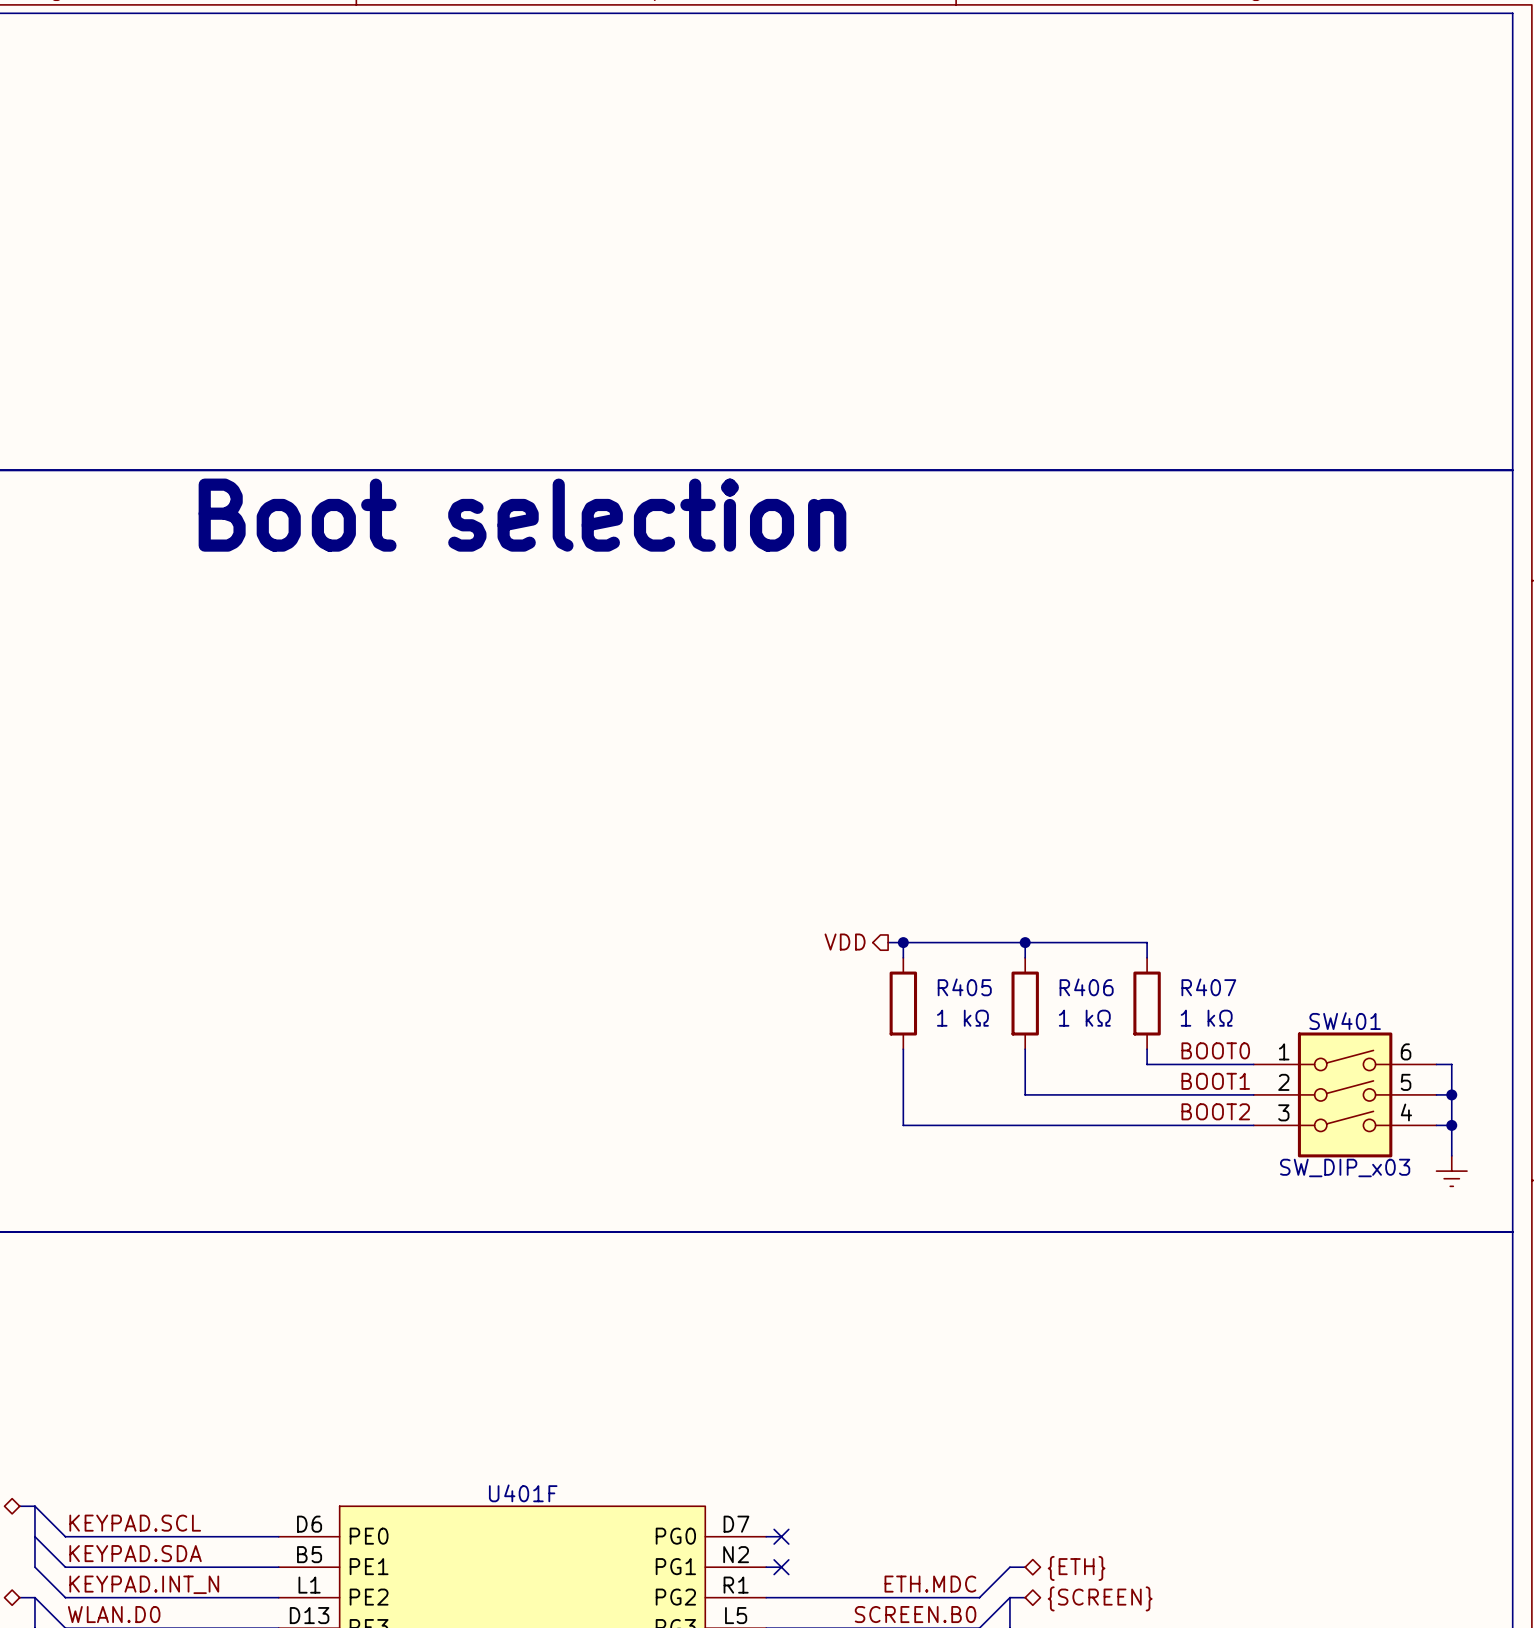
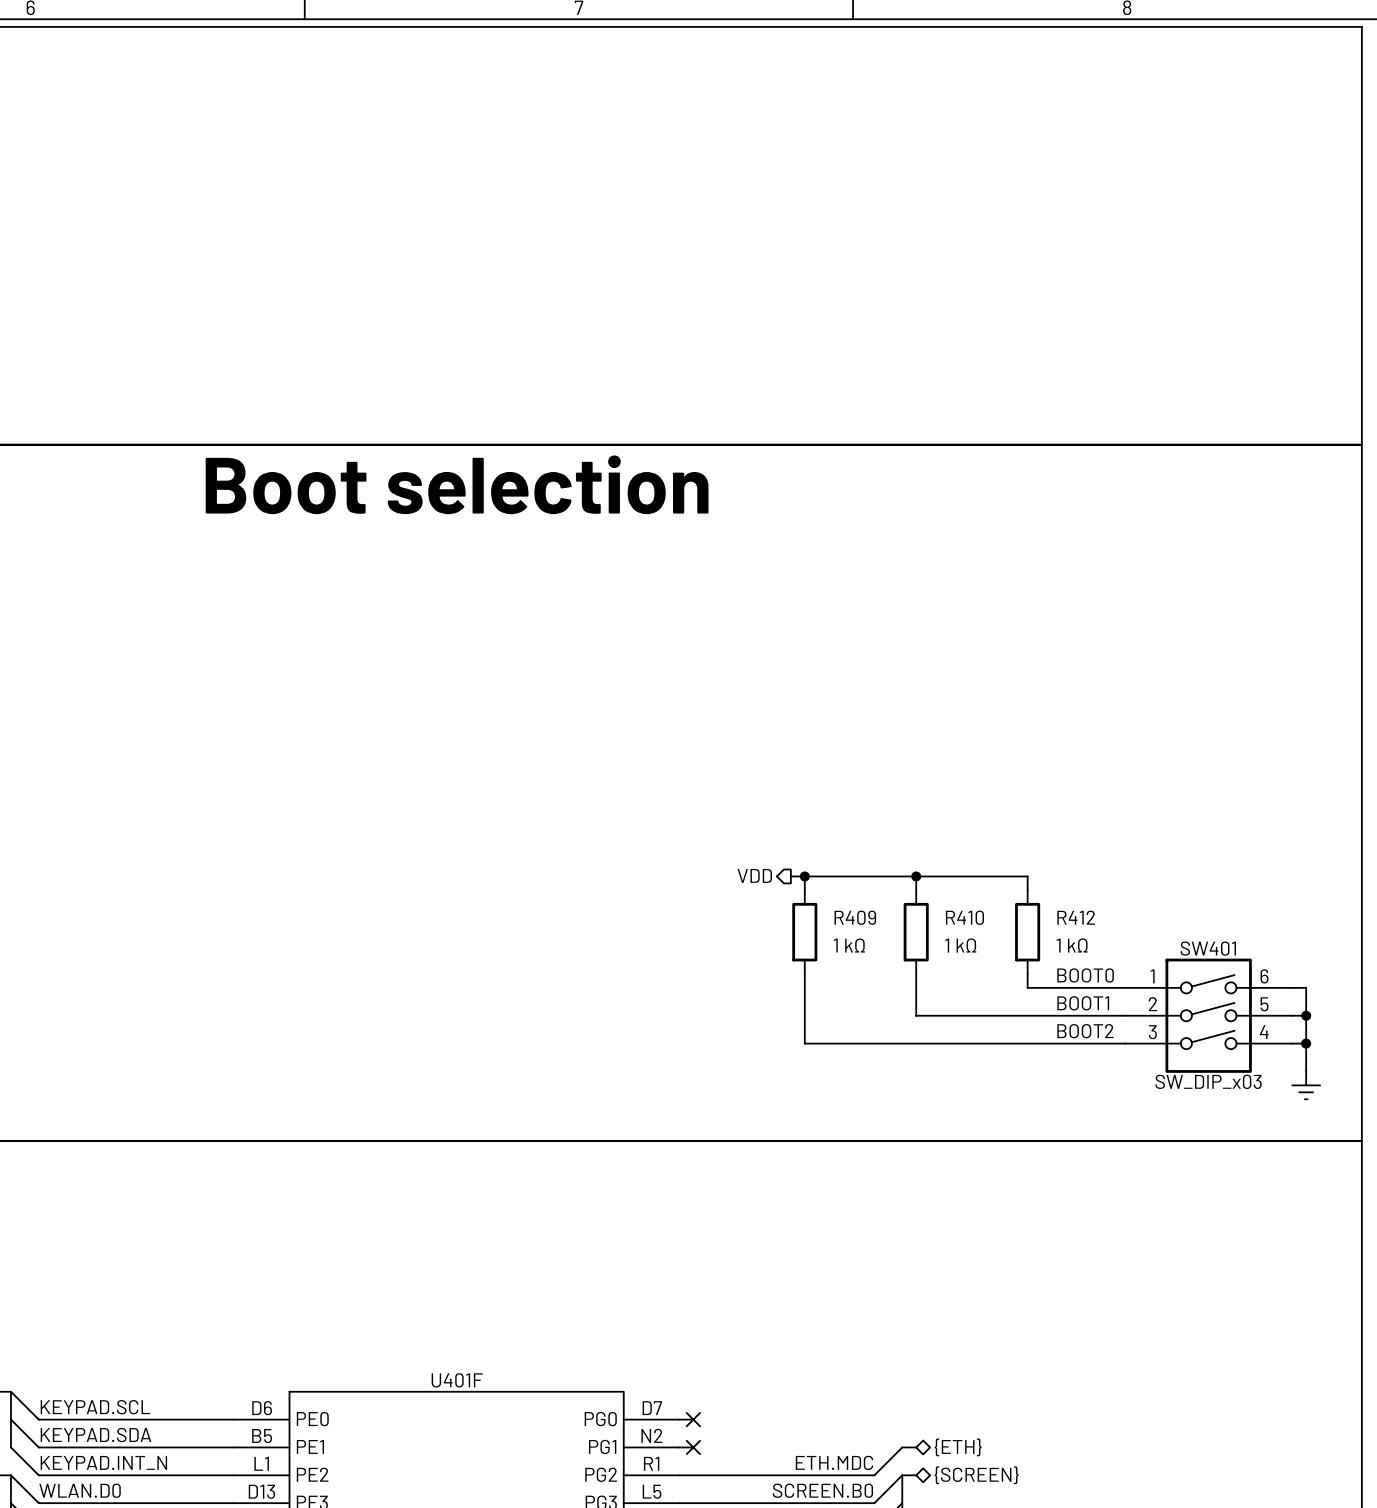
R405 name: R405 (964, 987) -> R409 (855, 917)
R406 name: R406 (1086, 987) -> R410 (964, 917)
R407 name: R407 (1208, 987) -> R412 (1076, 917)

